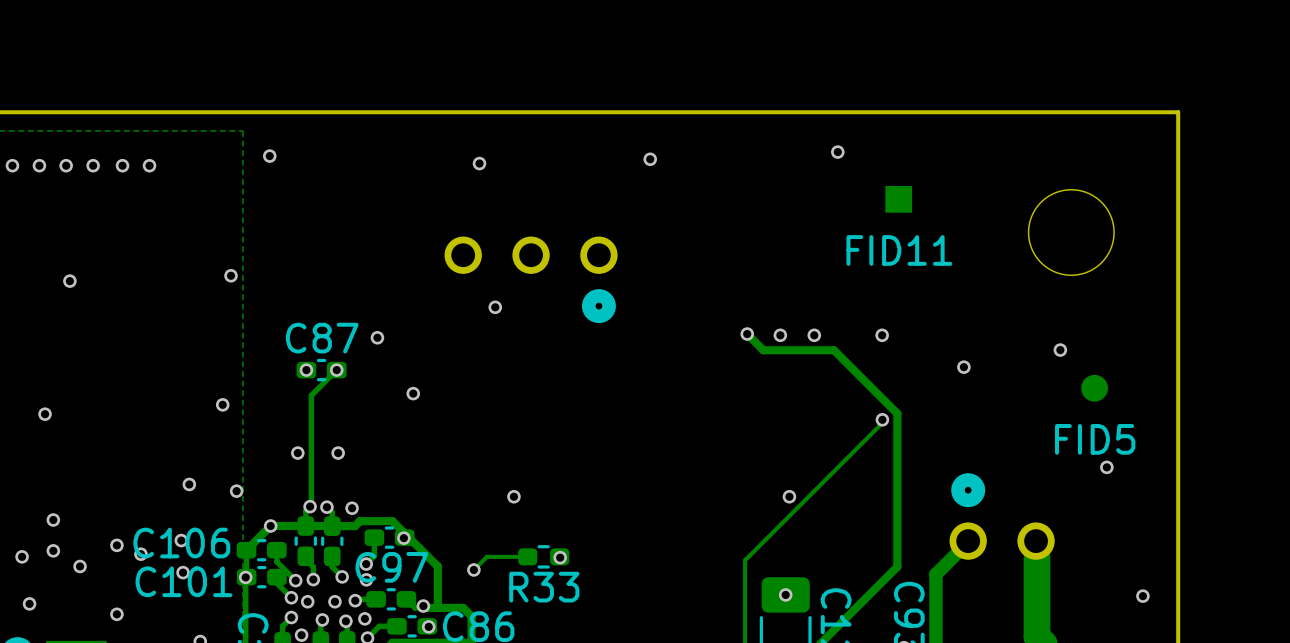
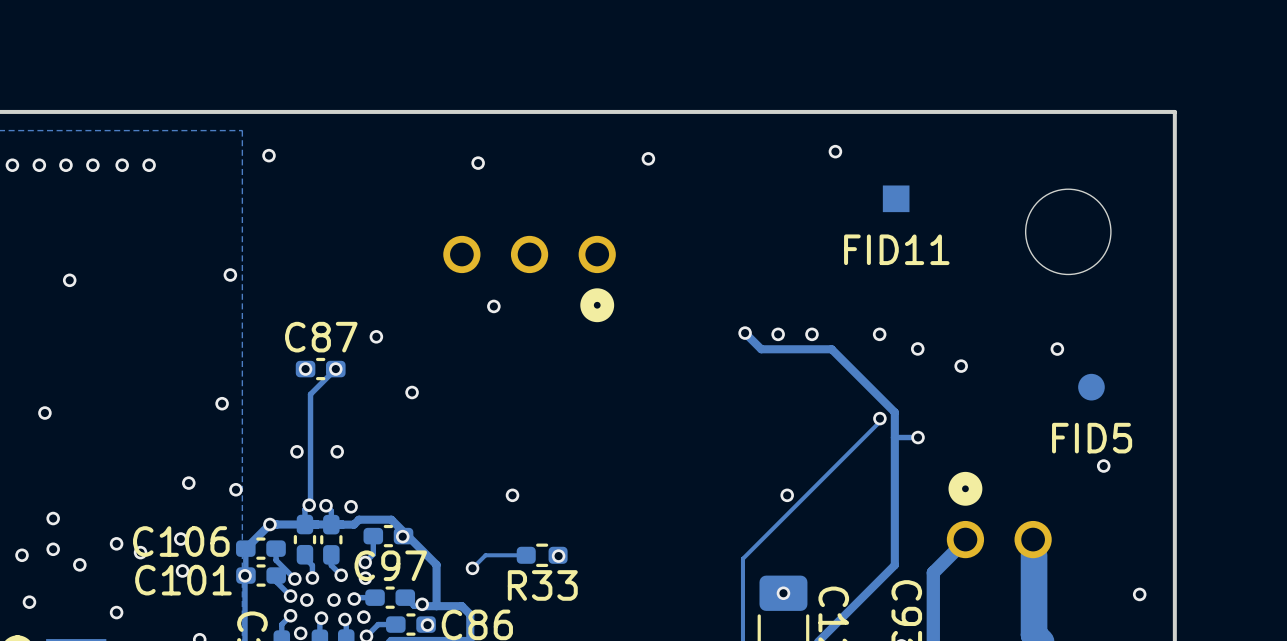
via: none -> (917, 348)
track: none -> (918, 437) (894, 437)
via: none -> (918, 437)

